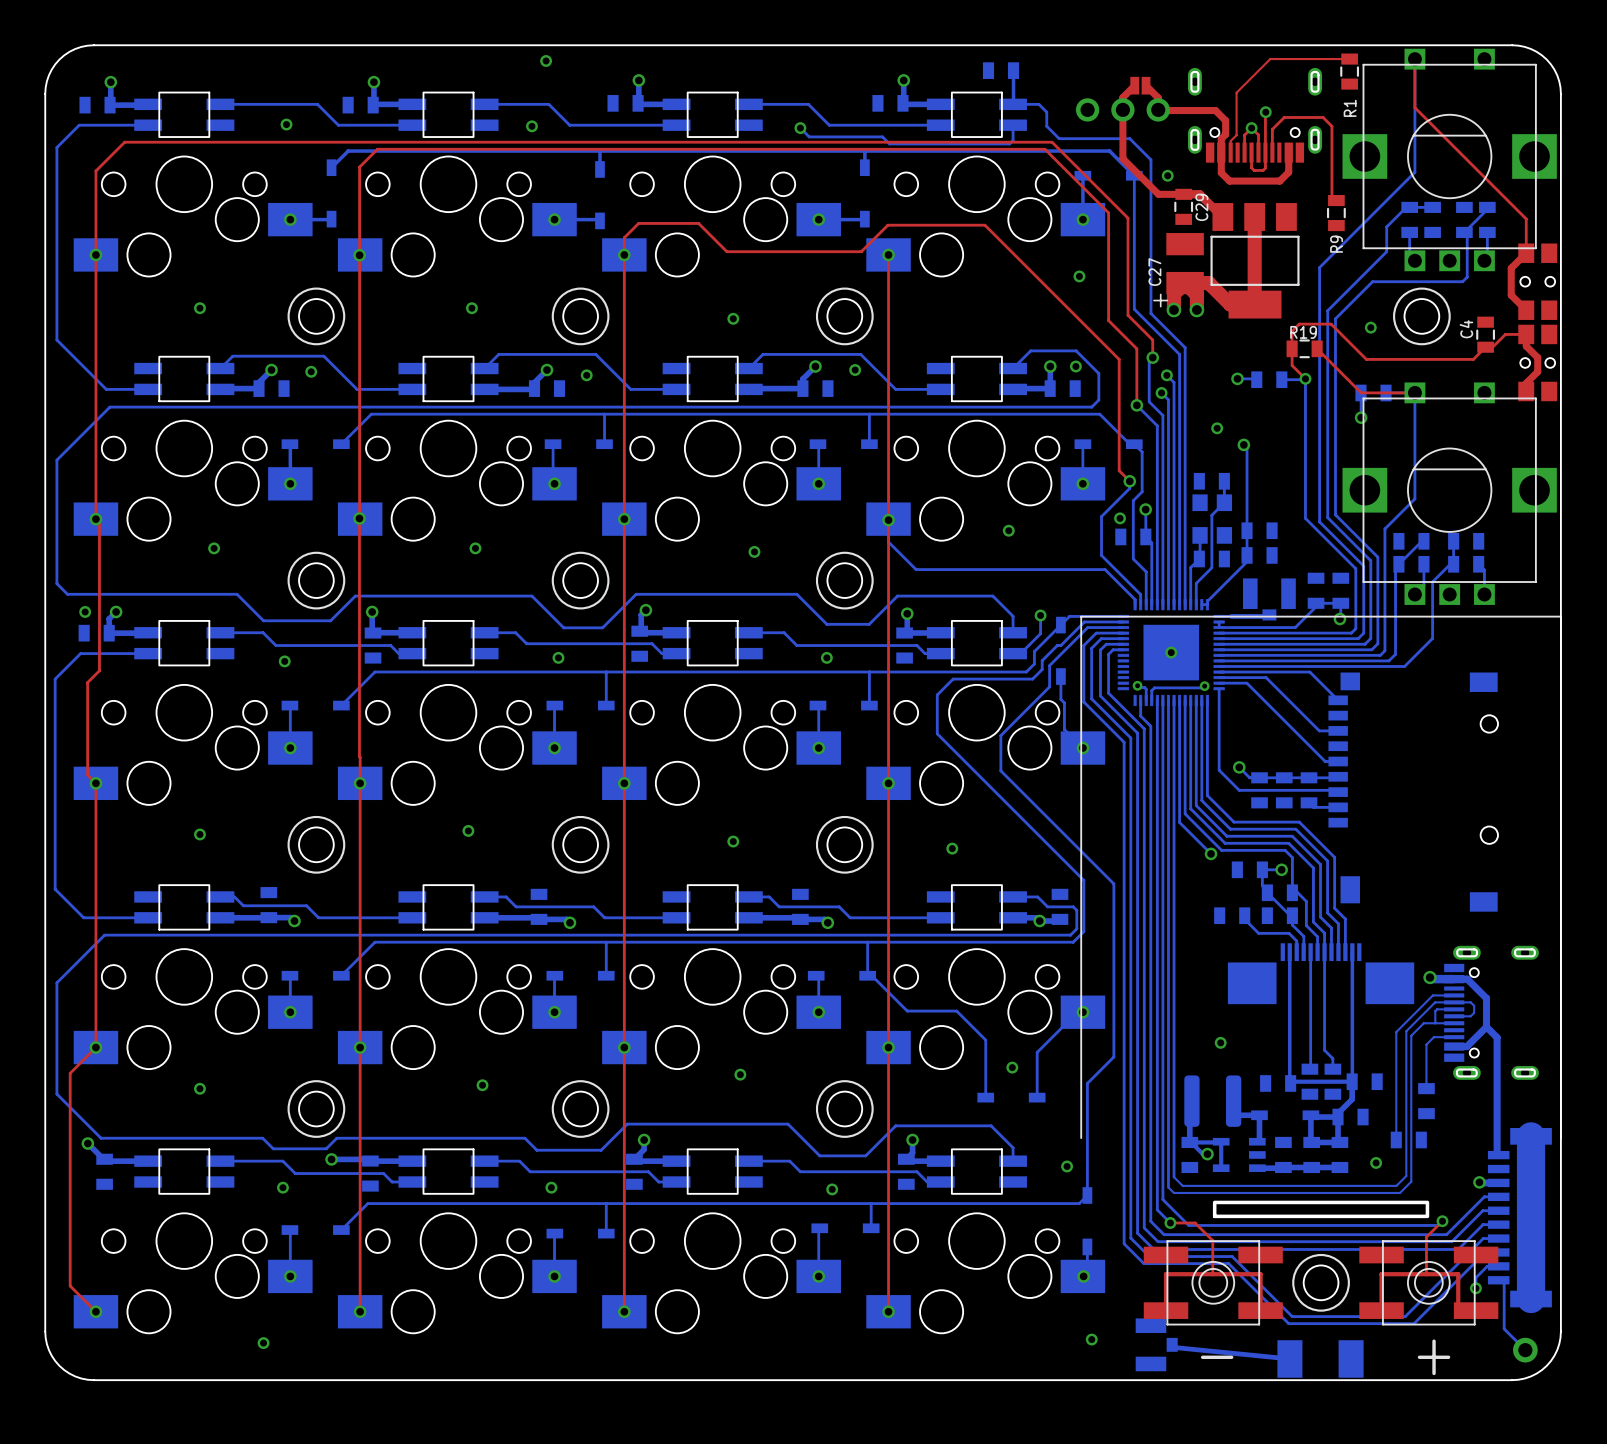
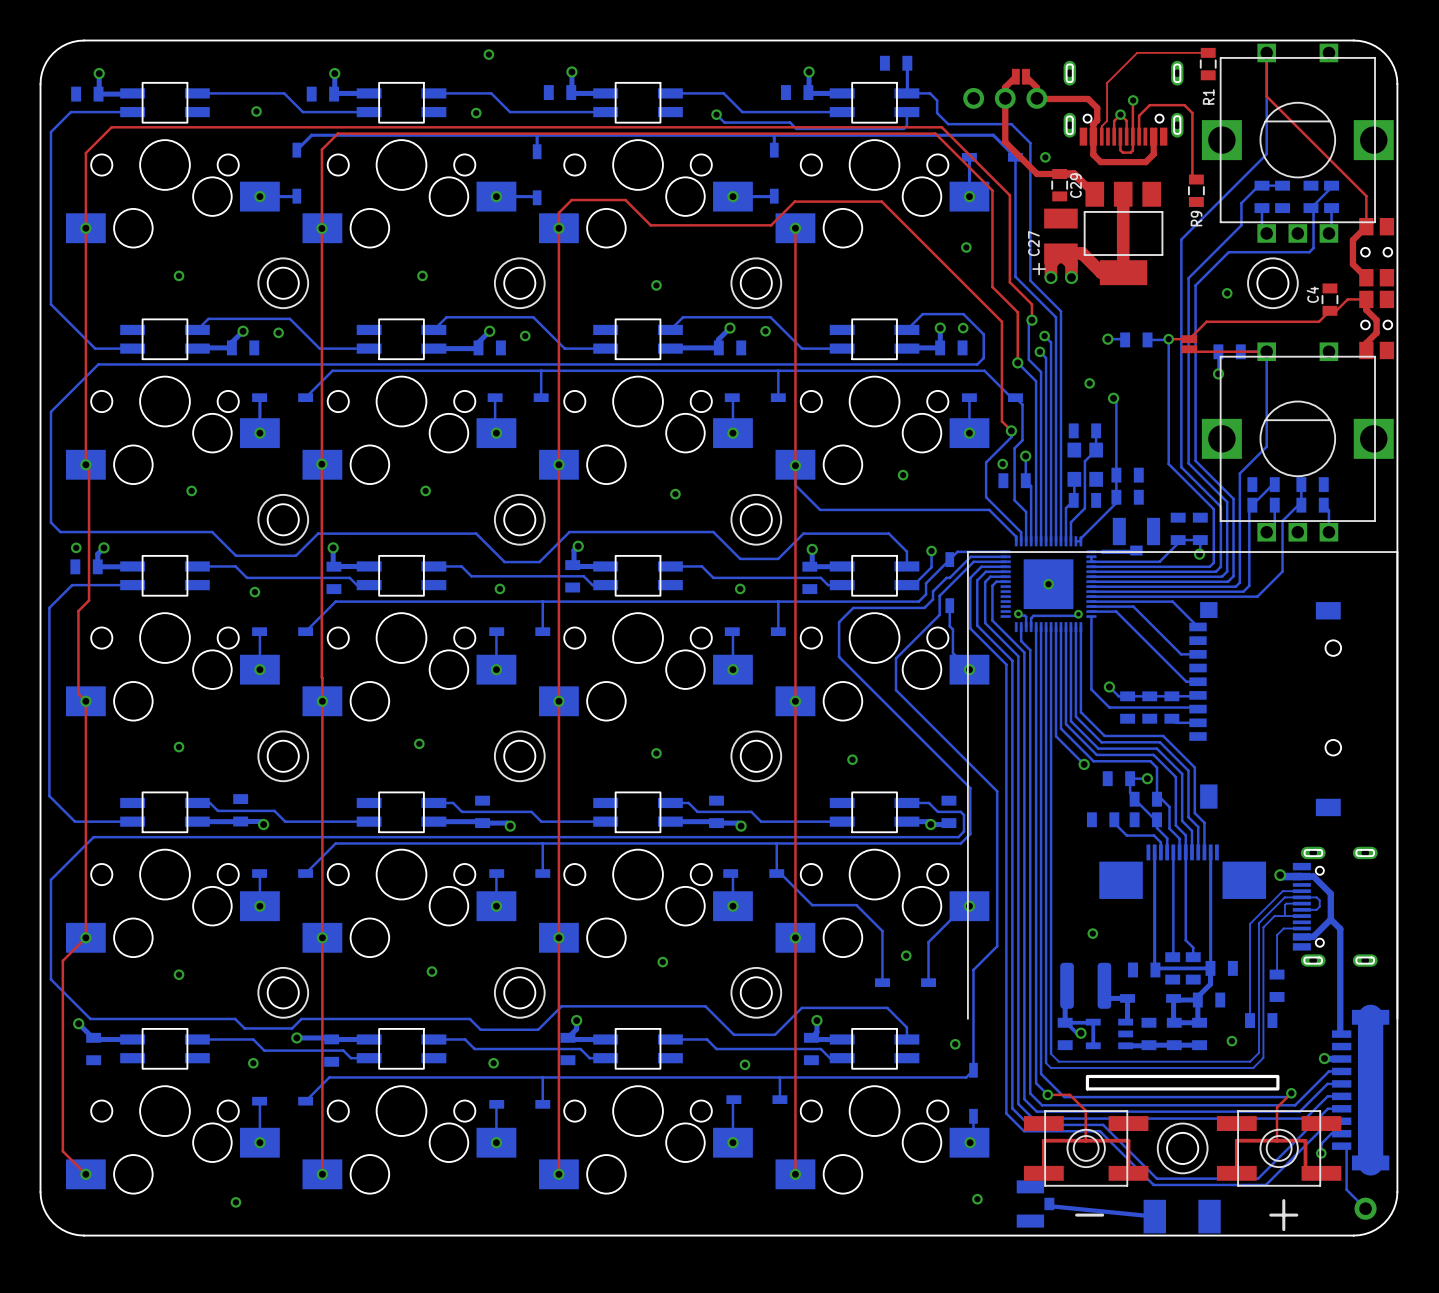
R19: (1304, 348) -> none
top track: (1317, 348) (1361, 392) -> (1189, 349) (1191, 351) (1218, 351)
top track: (1366, 359) (1331, 324) (1299, 324) (1292, 331) (1292, 365) (1305, 378) -> (1223, 321) (1206, 321) (1189, 339) (1168, 339)
part: none -> (1189, 344)

